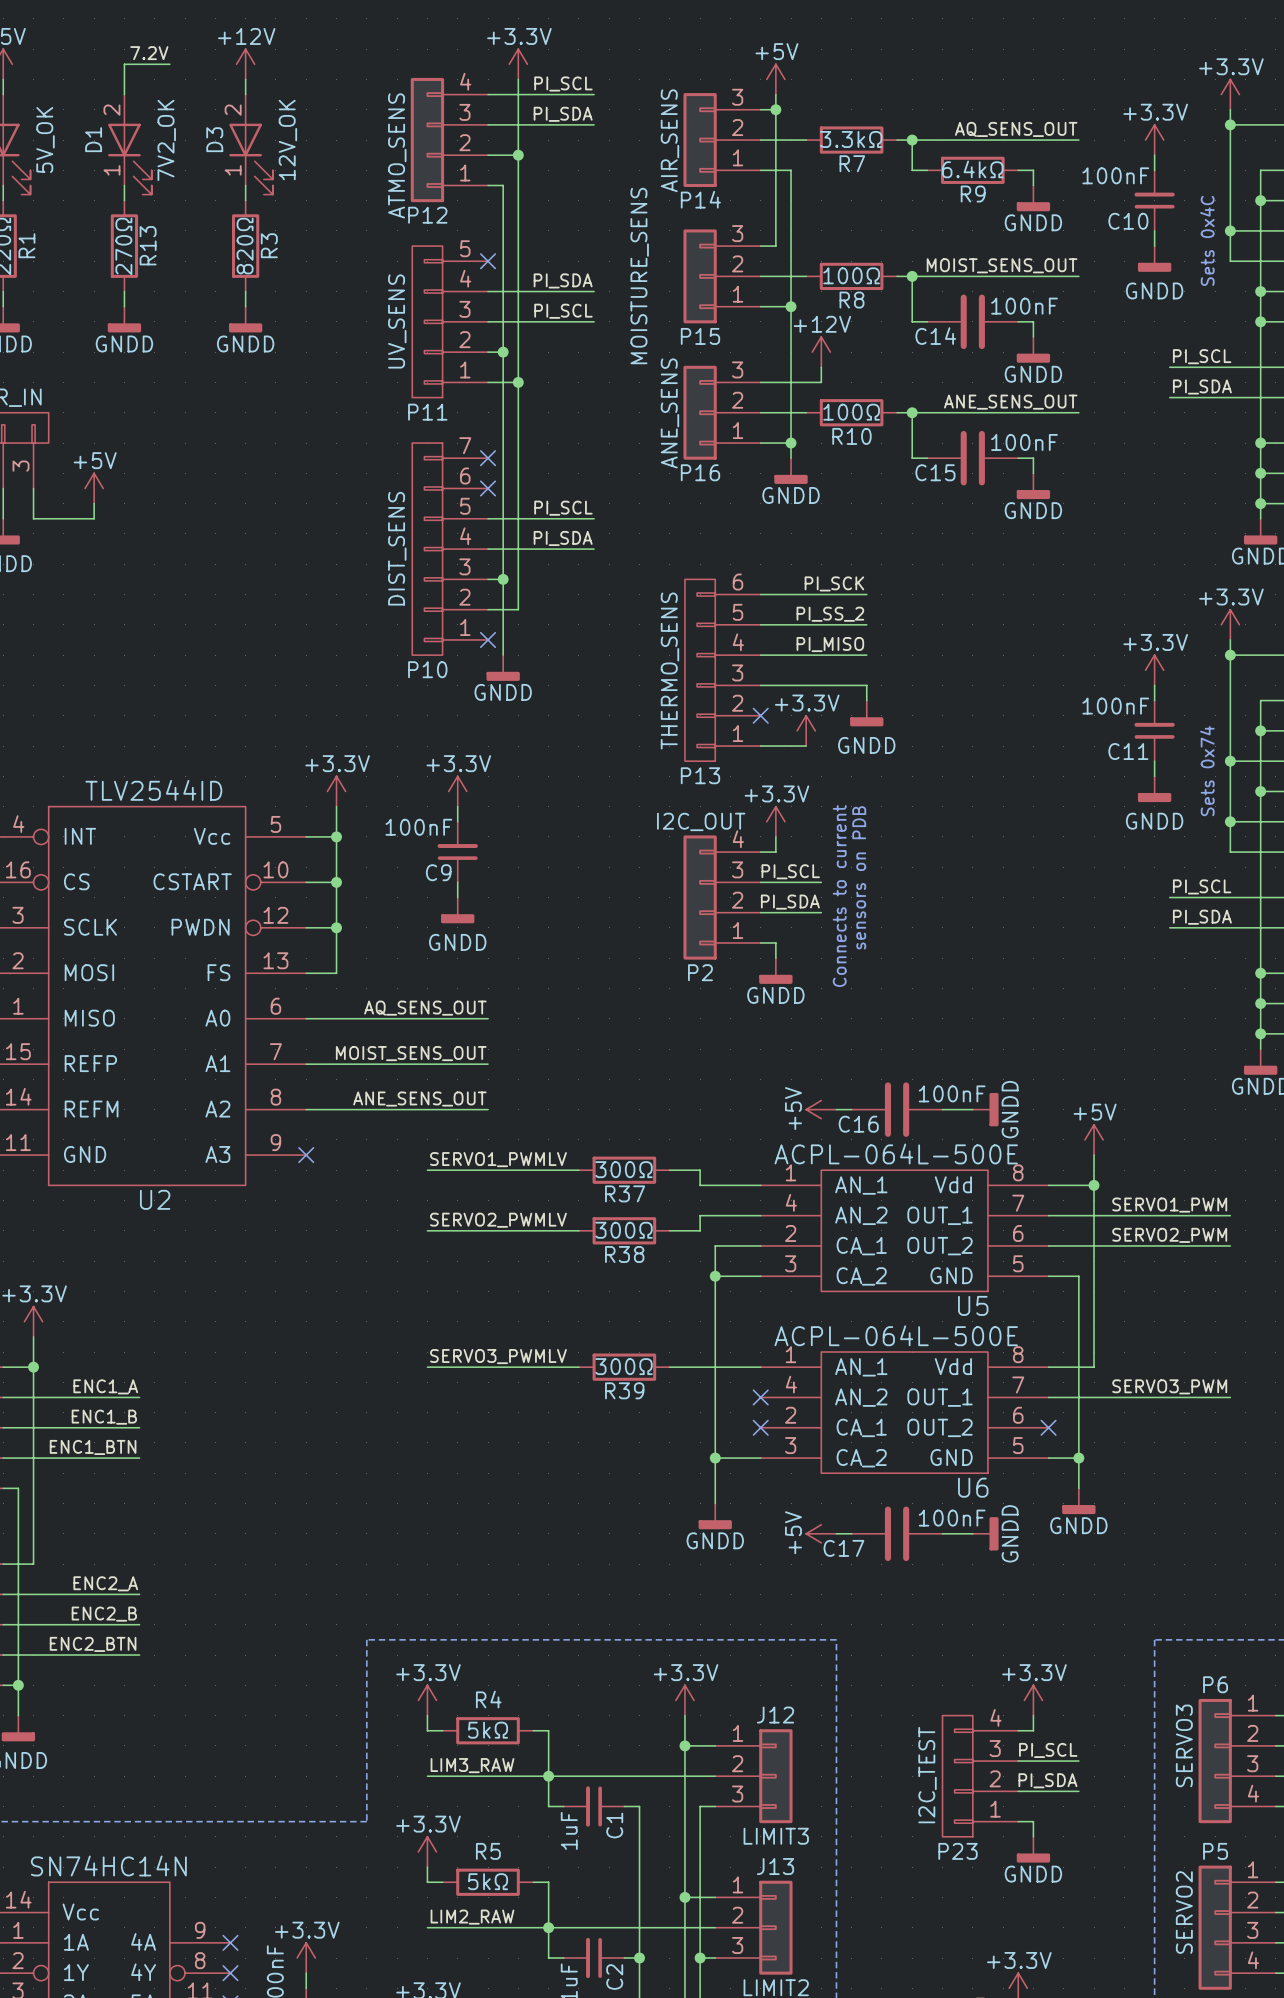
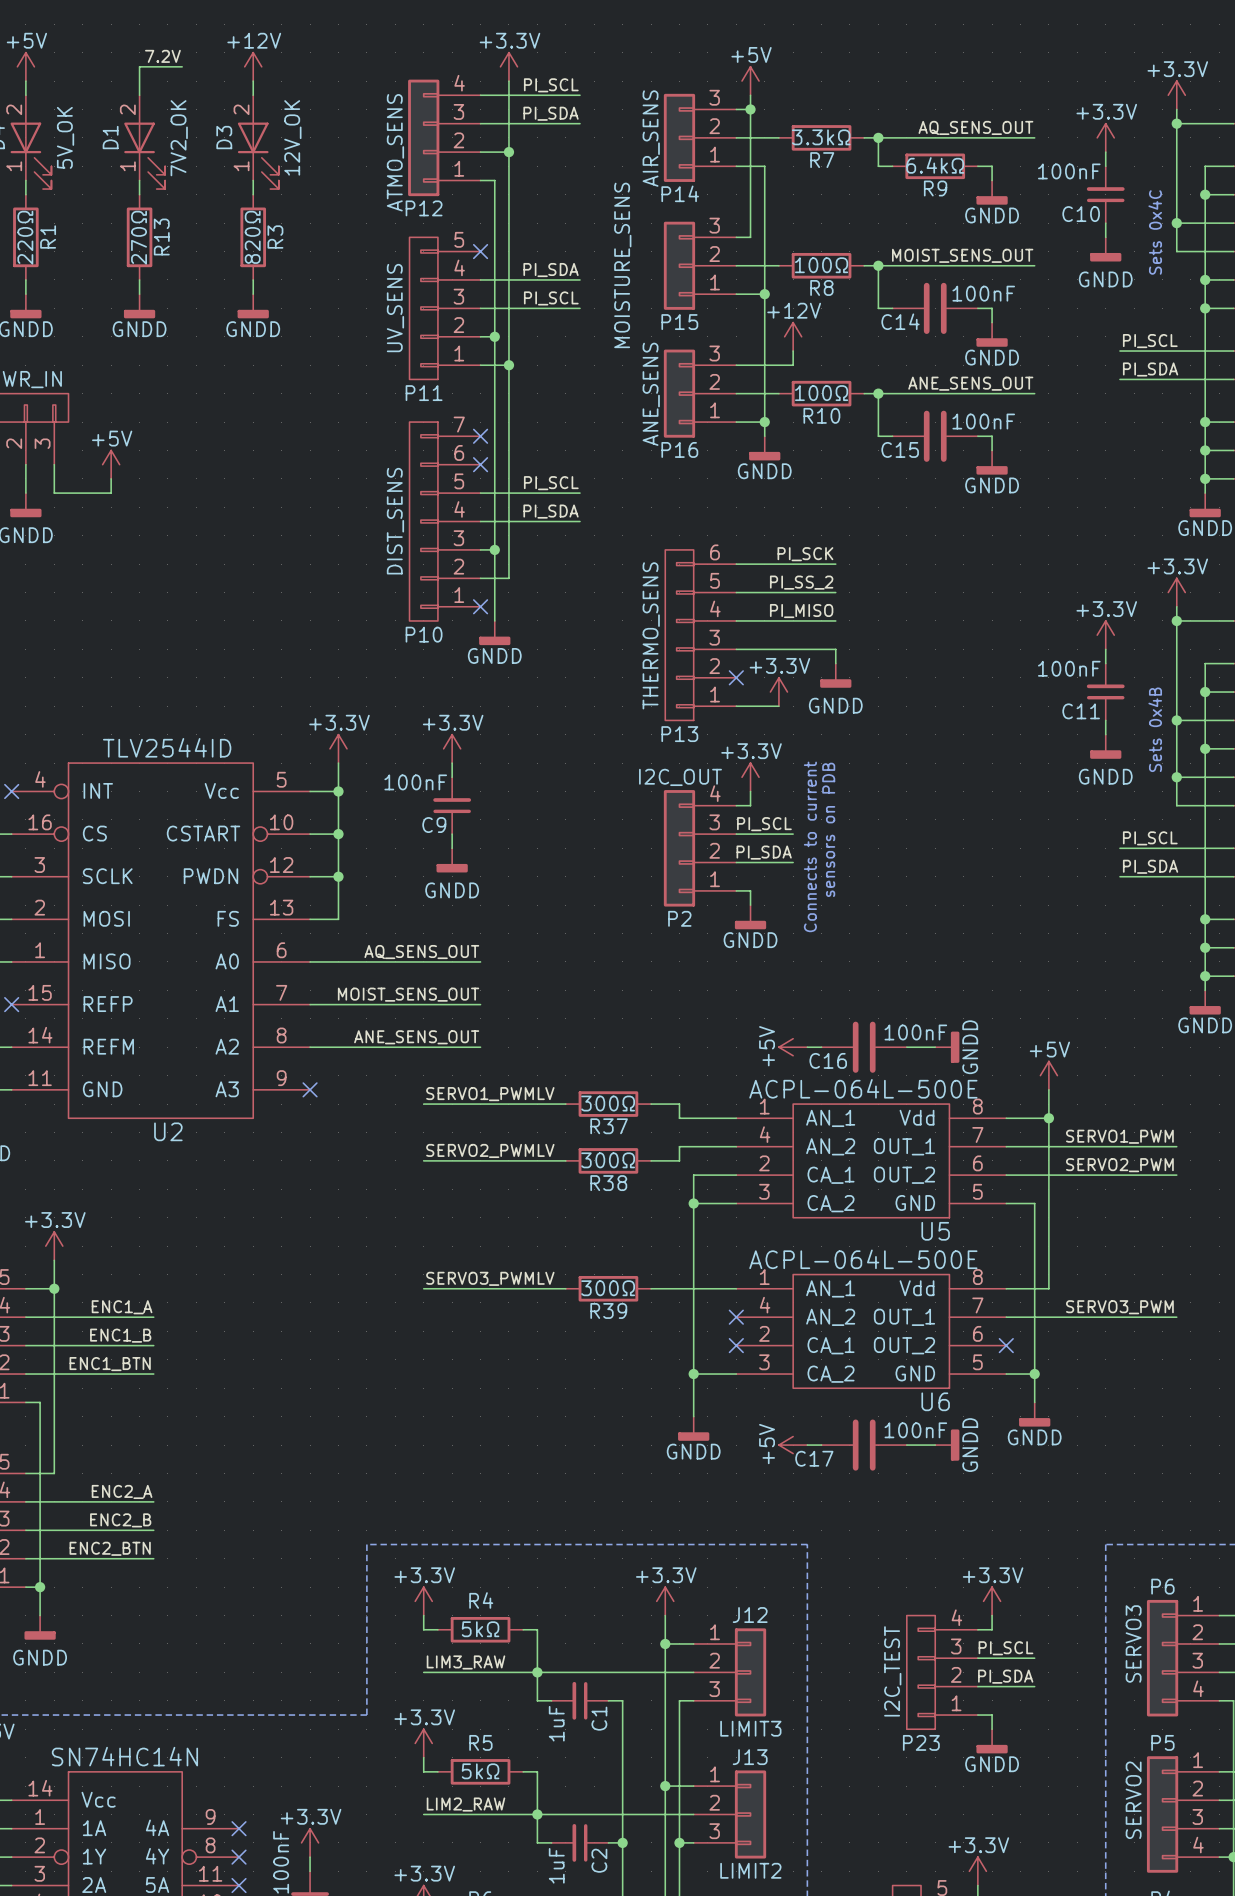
text: Sets 0x74 (1207, 771) -> Sets 0x4B (1155, 729)

